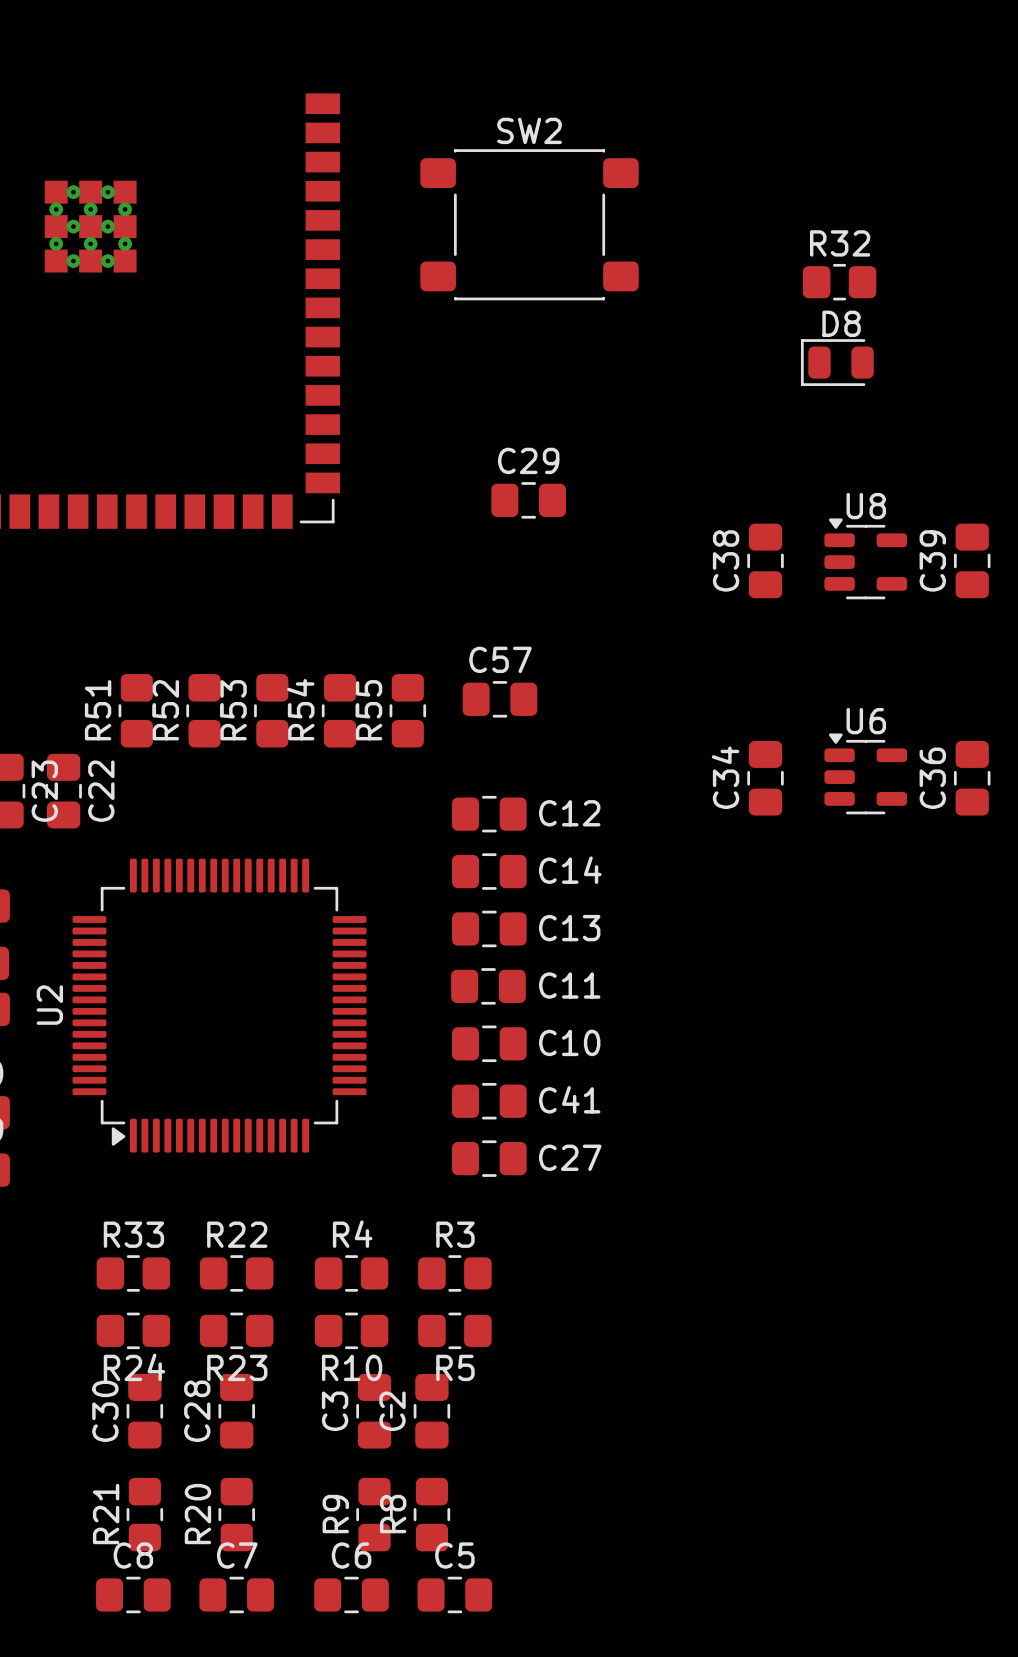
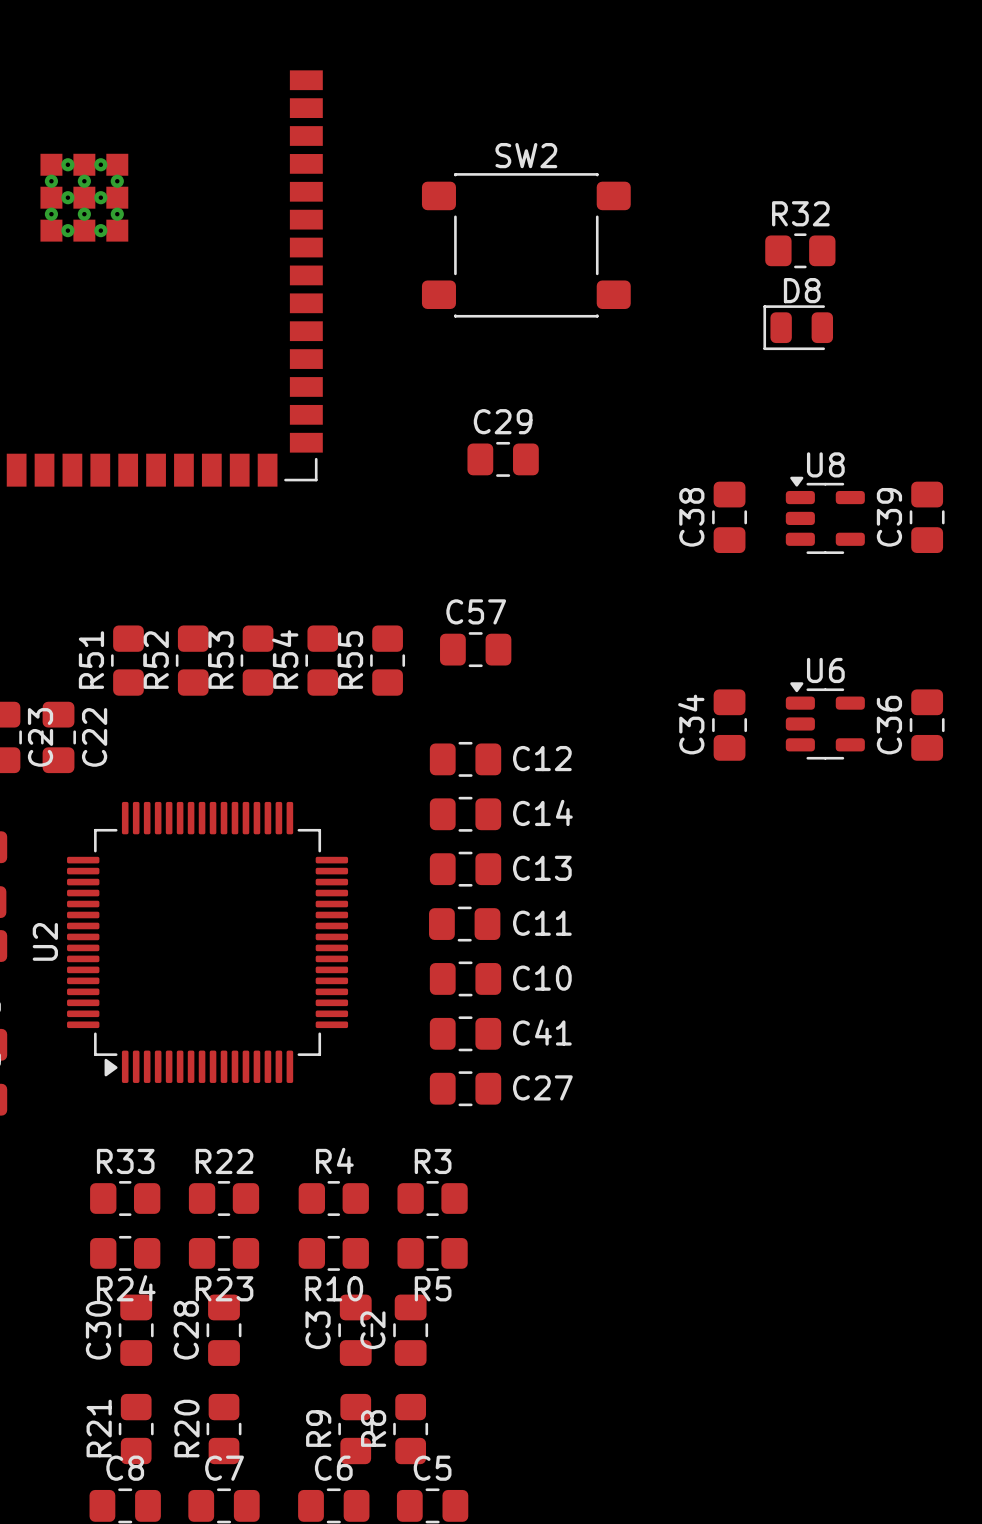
SW2 position: (529, 224) -> (526, 245)

